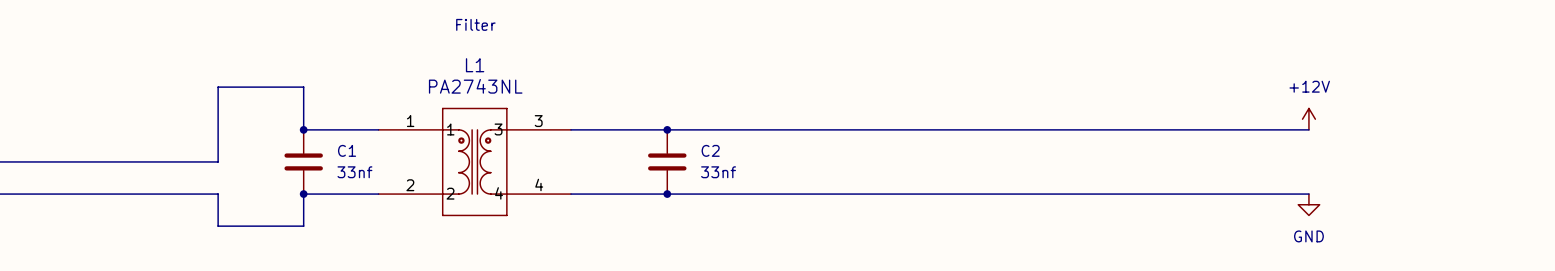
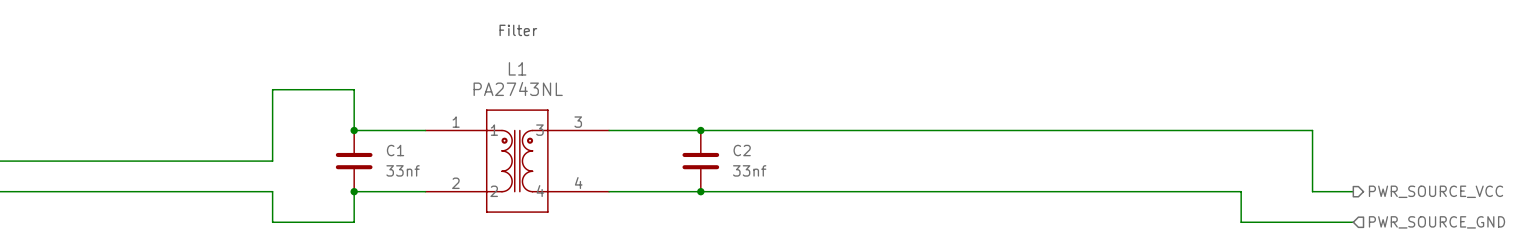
power symbol: +12V (1308, 119) -> none
wire: none -> (1312, 130) (1312, 191) (1353, 191)
wire: (1234, 194) (1308, 194) -> (1241, 191) (1241, 222) (1353, 222)
hierarchical label: none -> PWR_SOURCE_VCC (1436, 191)
power symbol: GND (1308, 204) -> none
hierarchical label: none -> PWR_SOURCE_GND (1436, 222)

